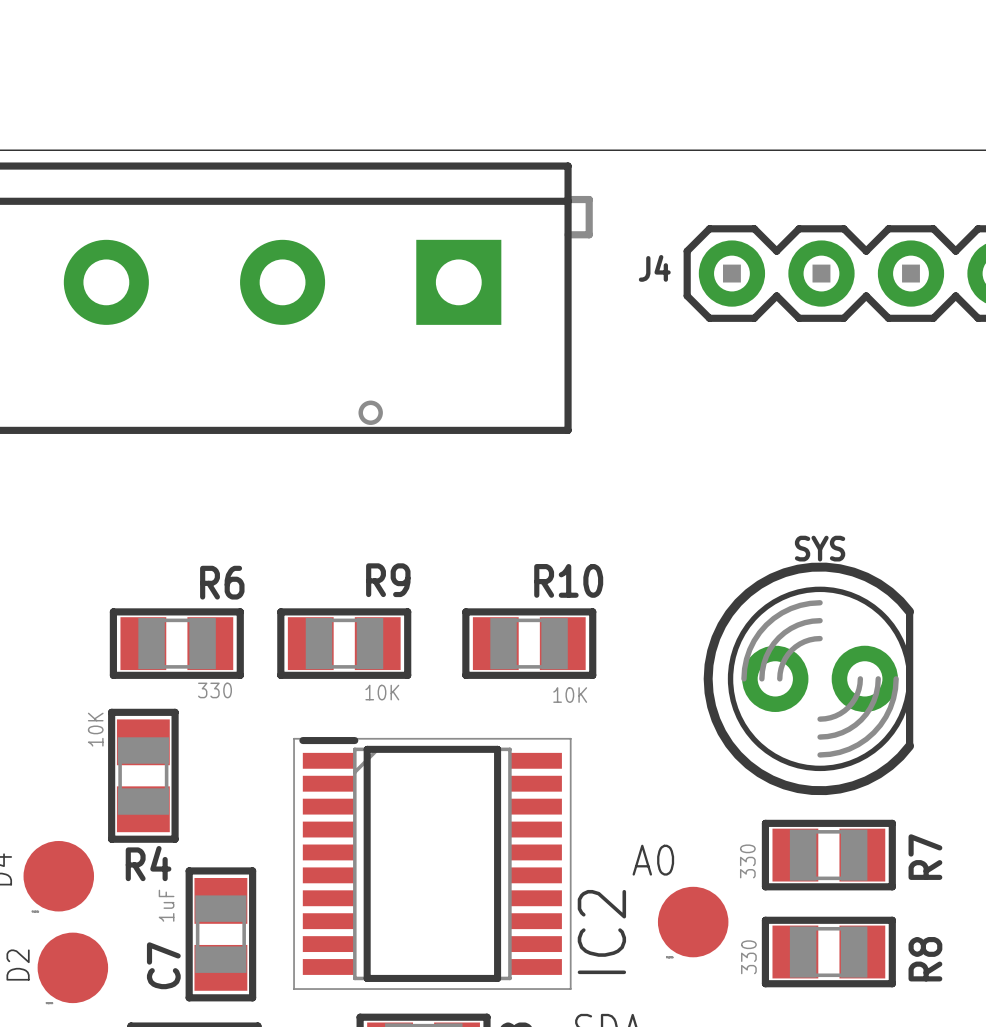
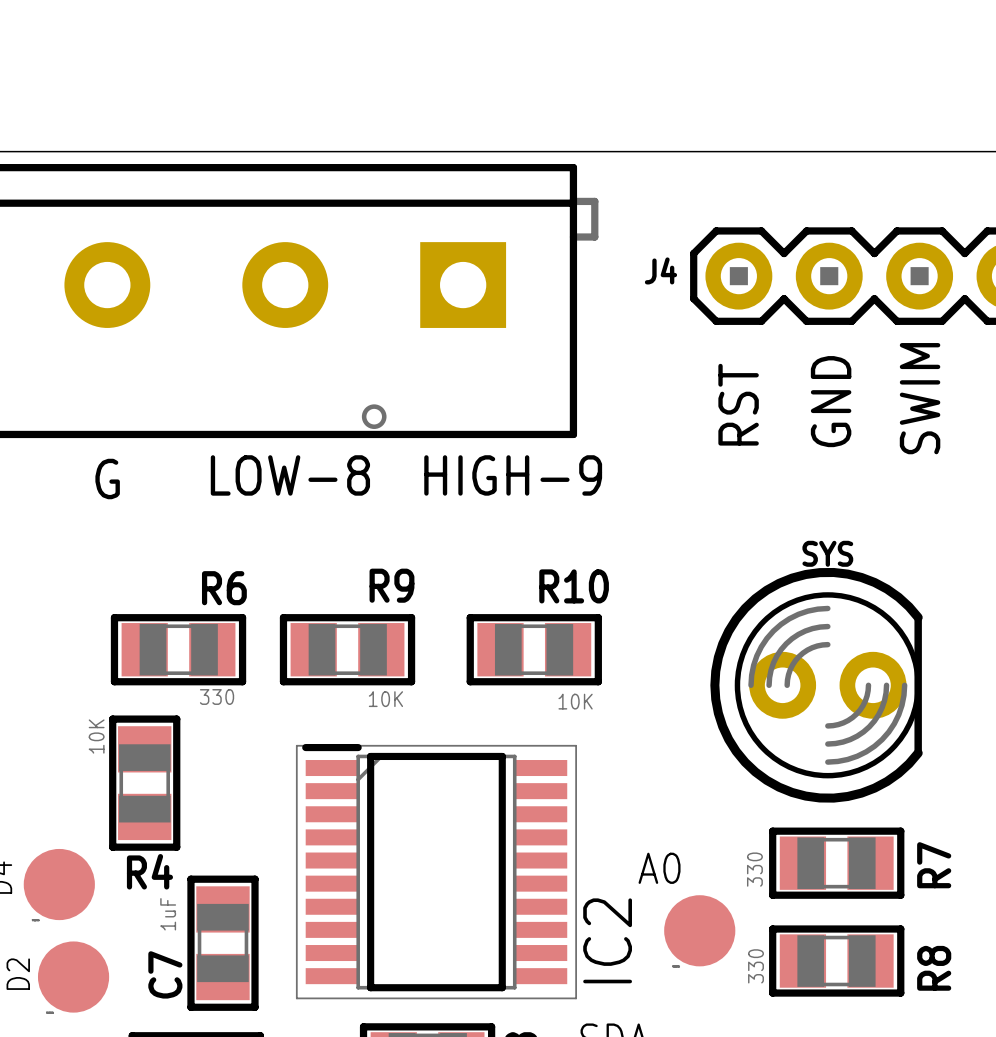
text: none -> SWIM (920, 398)
text: none -> GND (831, 401)
text: none -> RST (738, 404)
text: none -> LOW-8 (290, 475)
text: none -> HIGH-9 (513, 475)
text: none -> G (107, 479)

